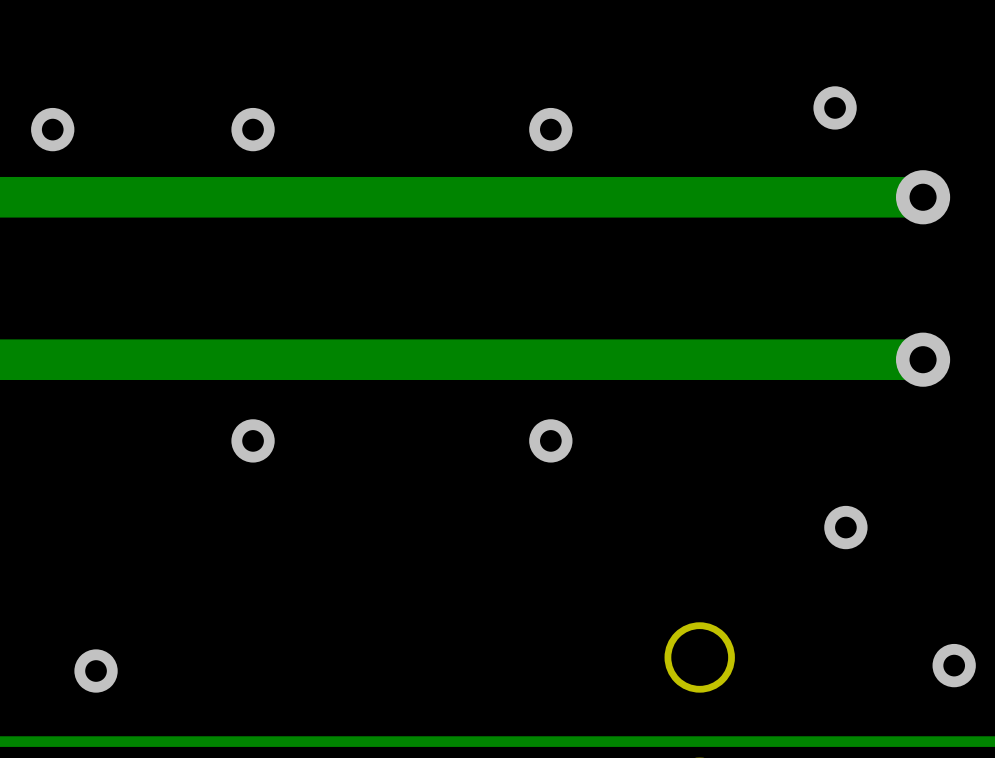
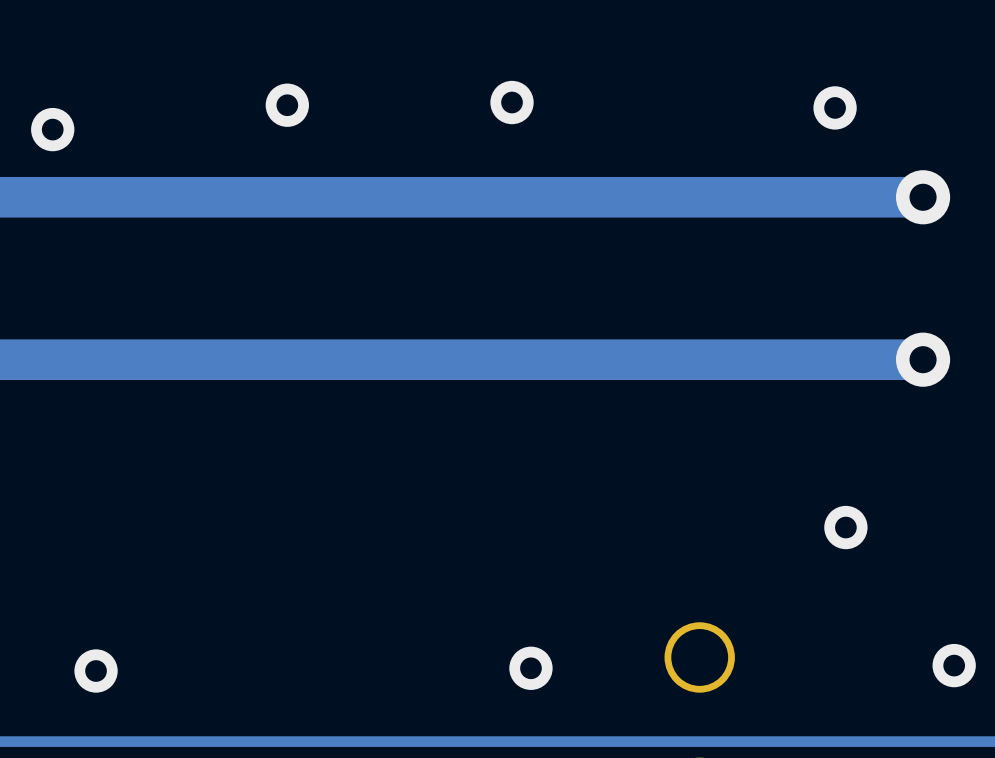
via position: (253, 129) -> (287, 105)
via position: (550, 129) -> (512, 102)
via: (253, 440) -> none
via: (550, 440) -> none
via: none -> (530, 668)

